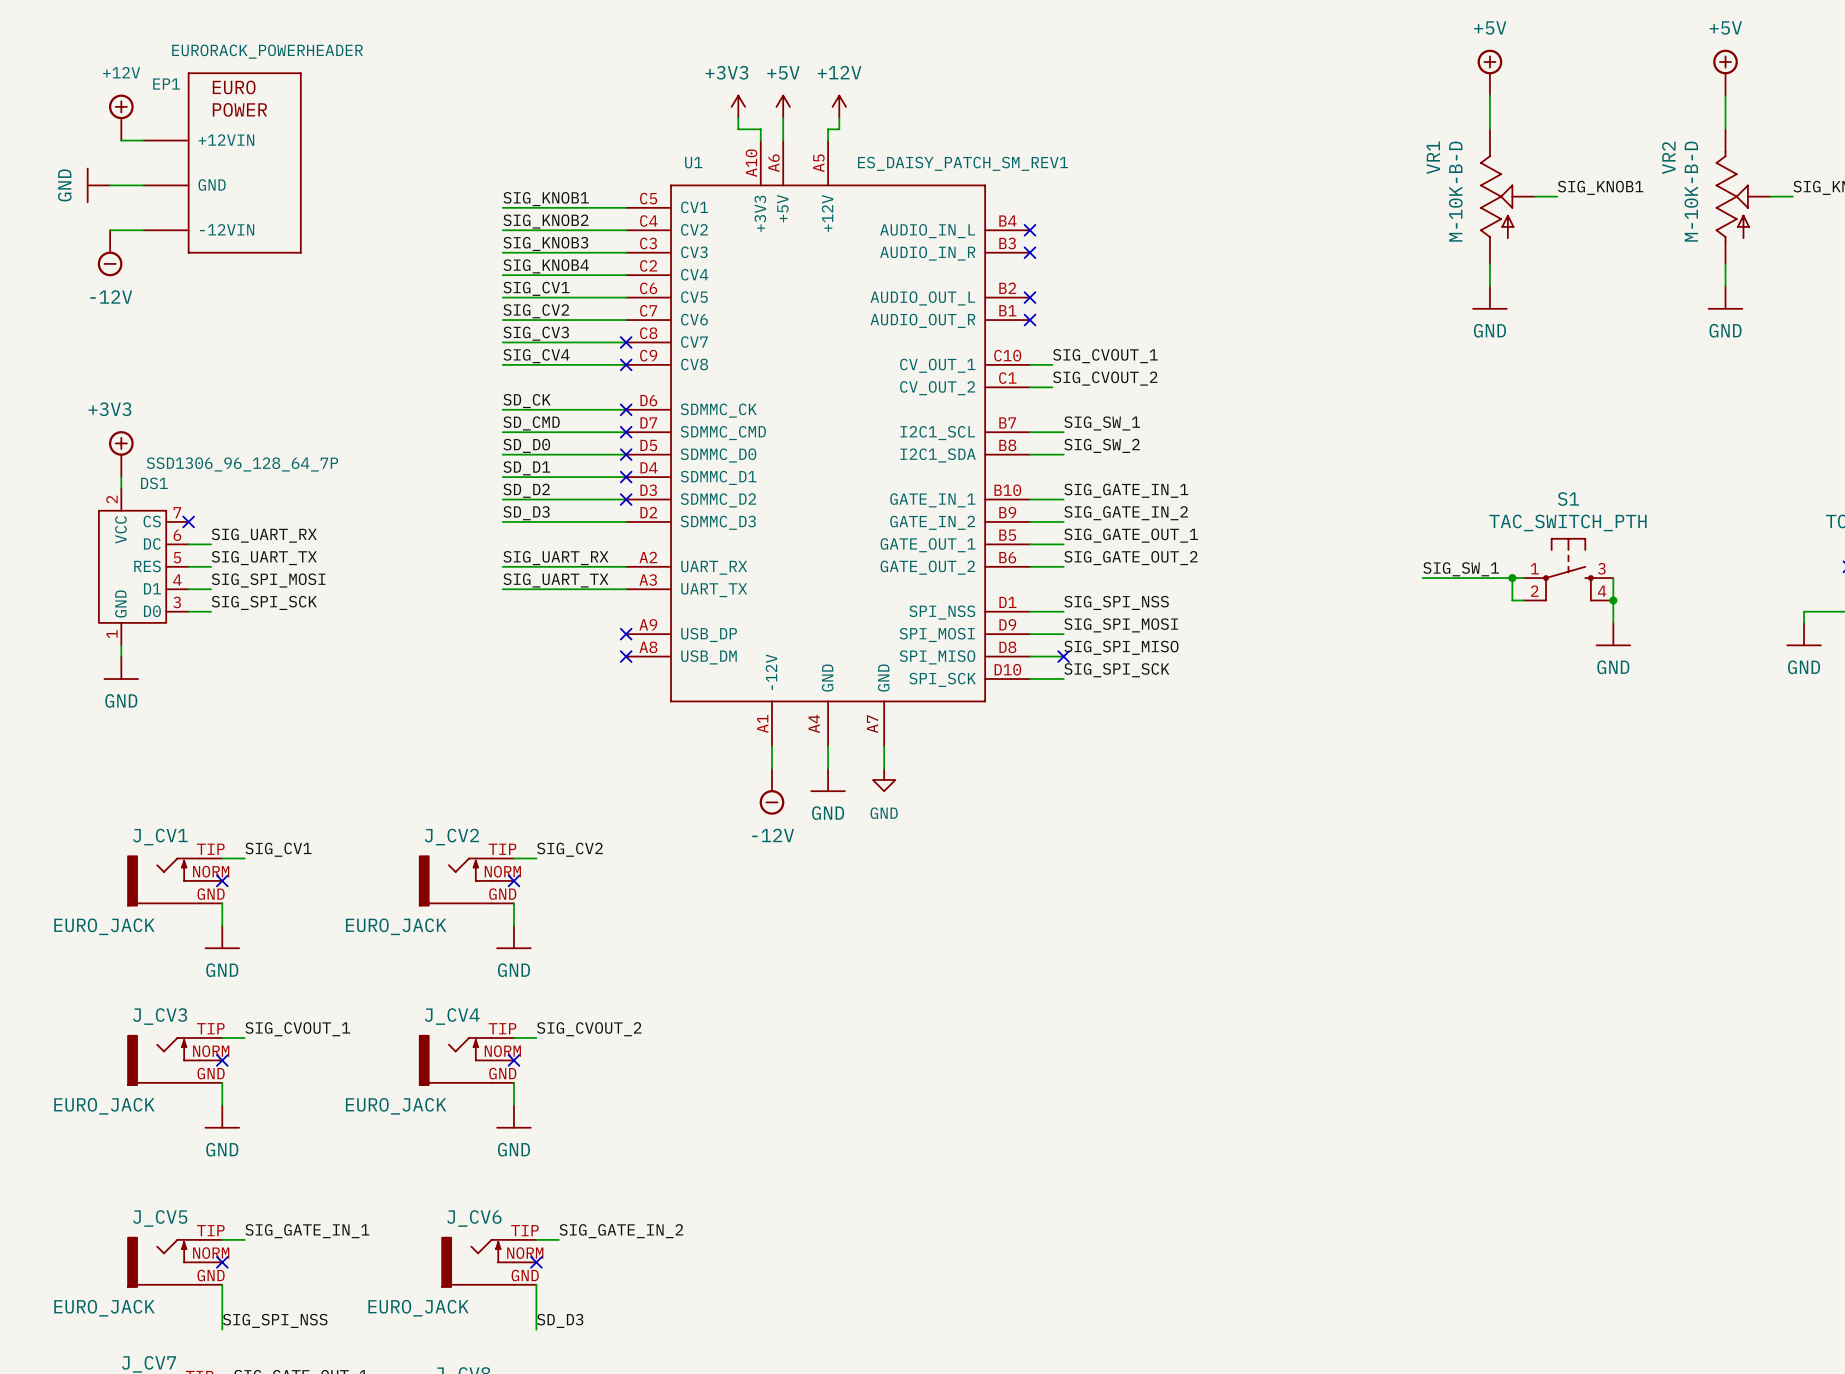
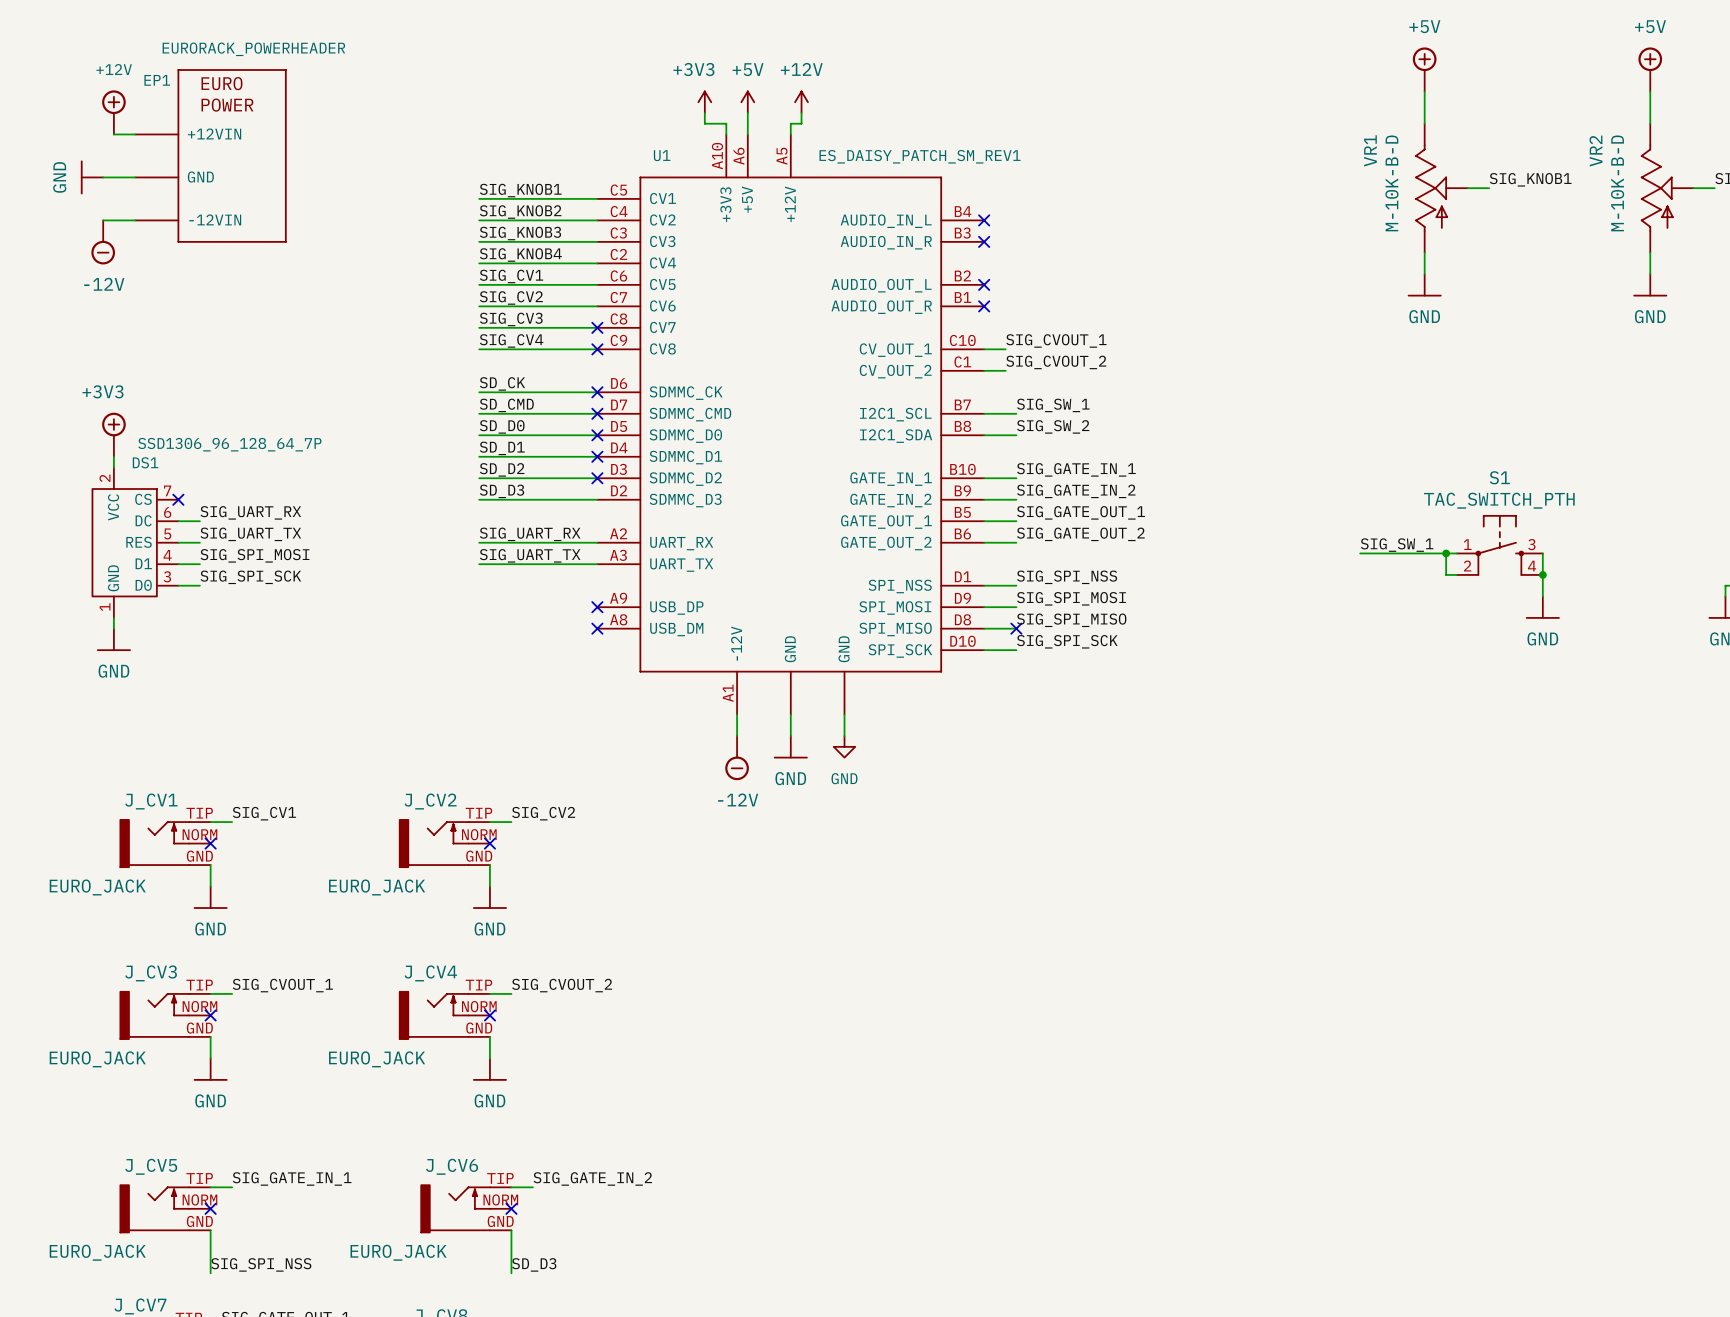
U1 text: A4 (814, 723) -> none
U1 text: A7 (872, 724) -> none

